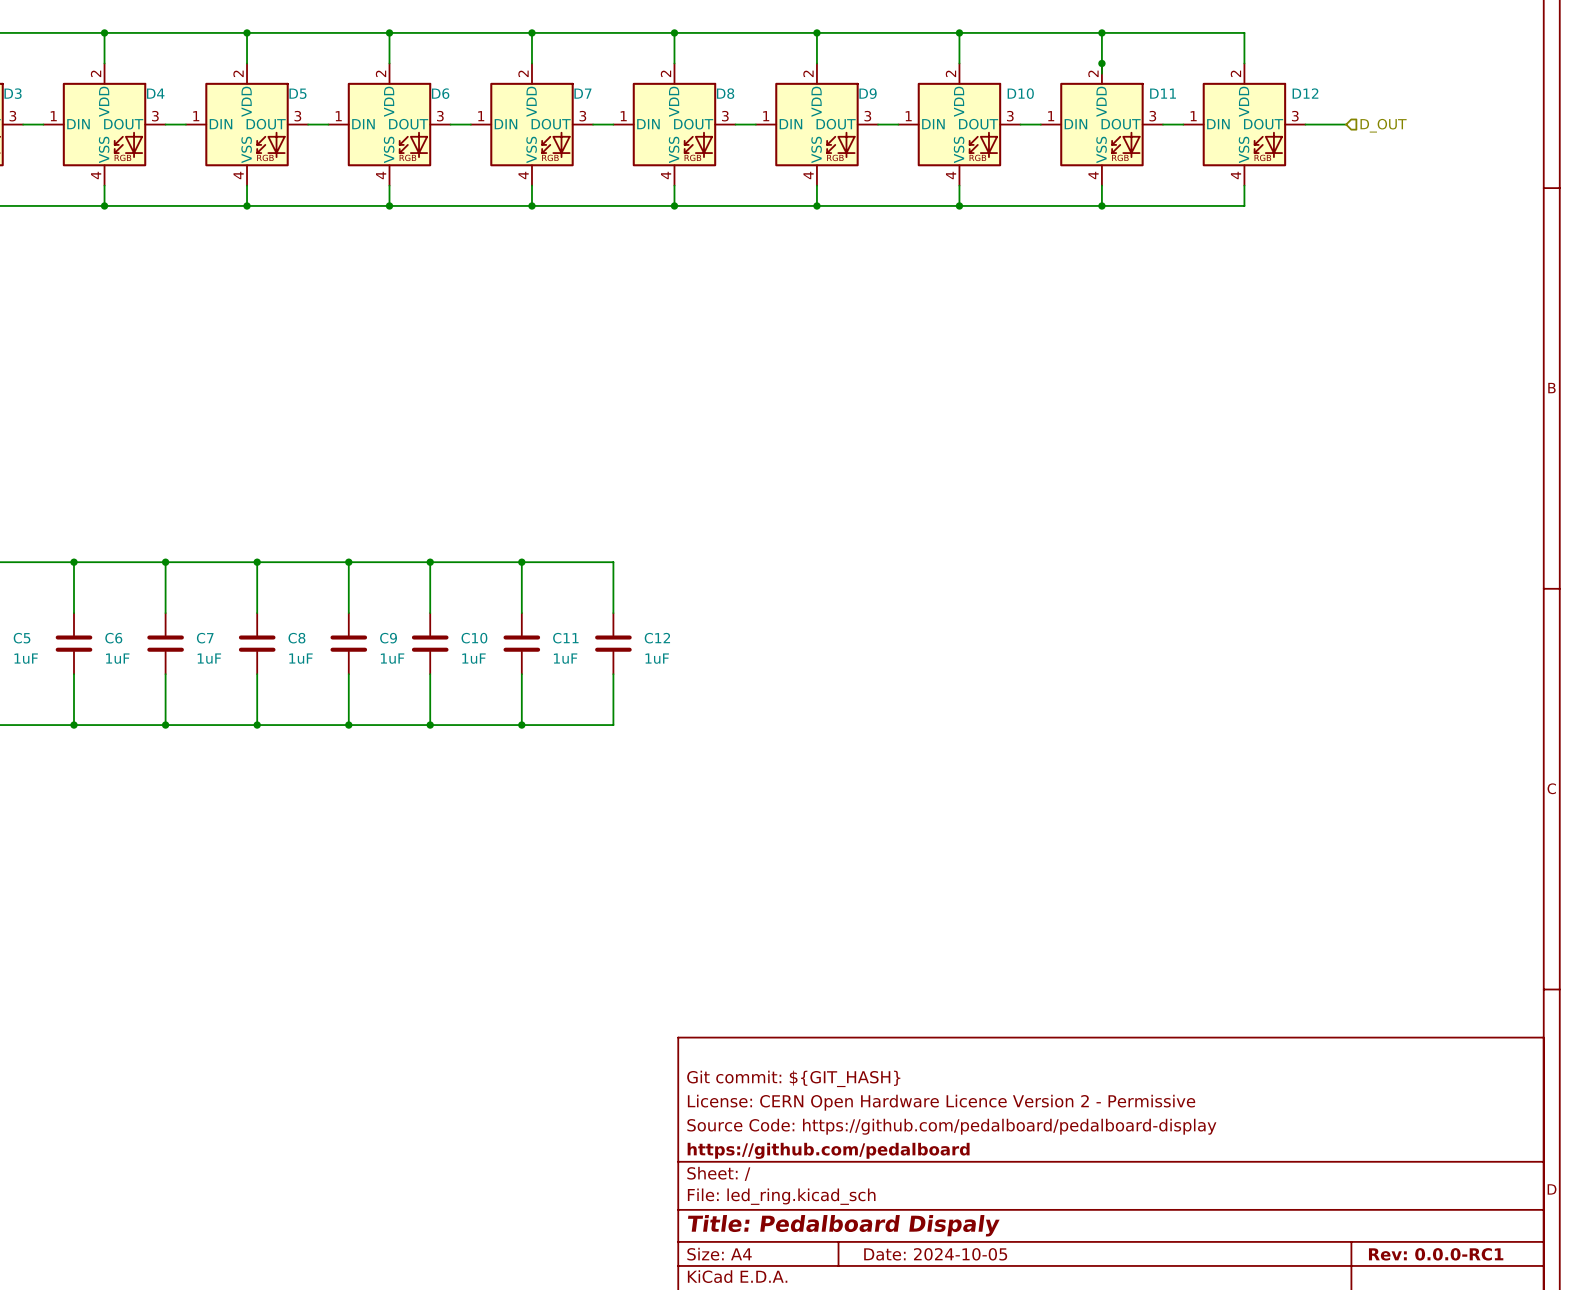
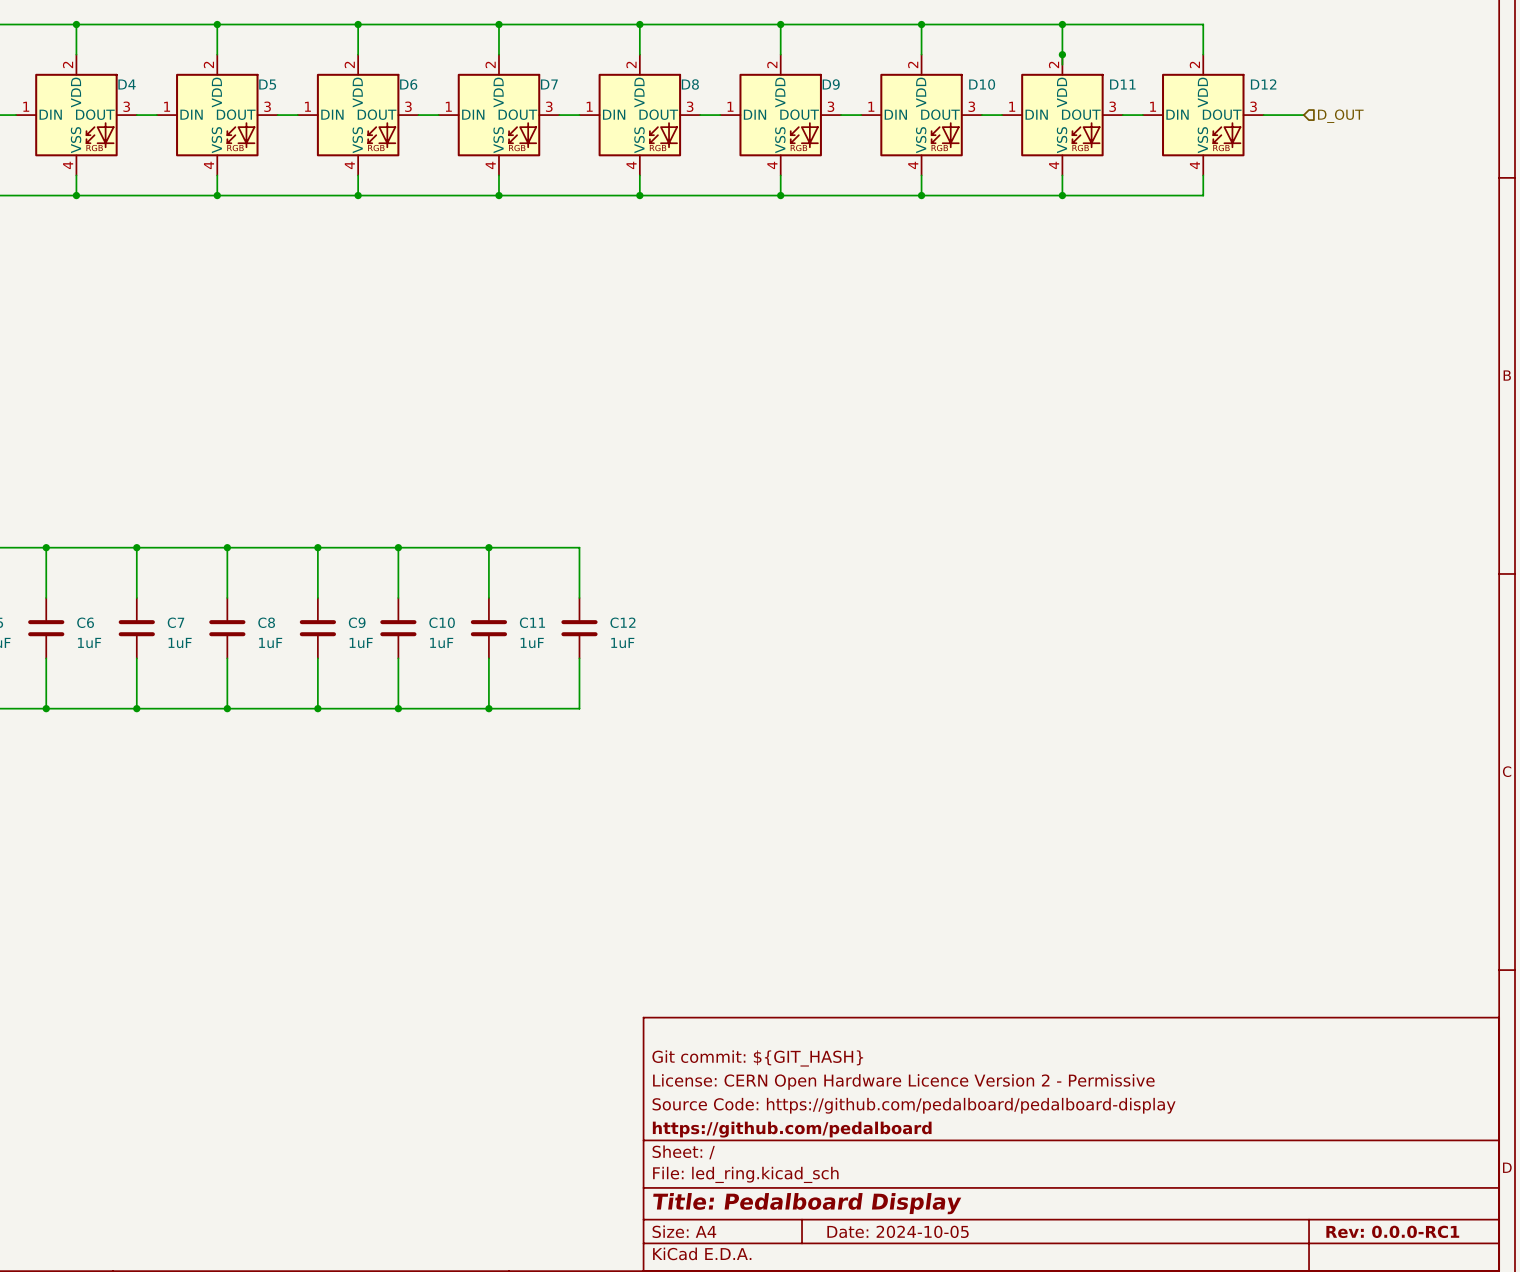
title block: Title: Pedalboard Dispaly (843, 1225) -> Title: Pedalboard Display (807, 1203)

